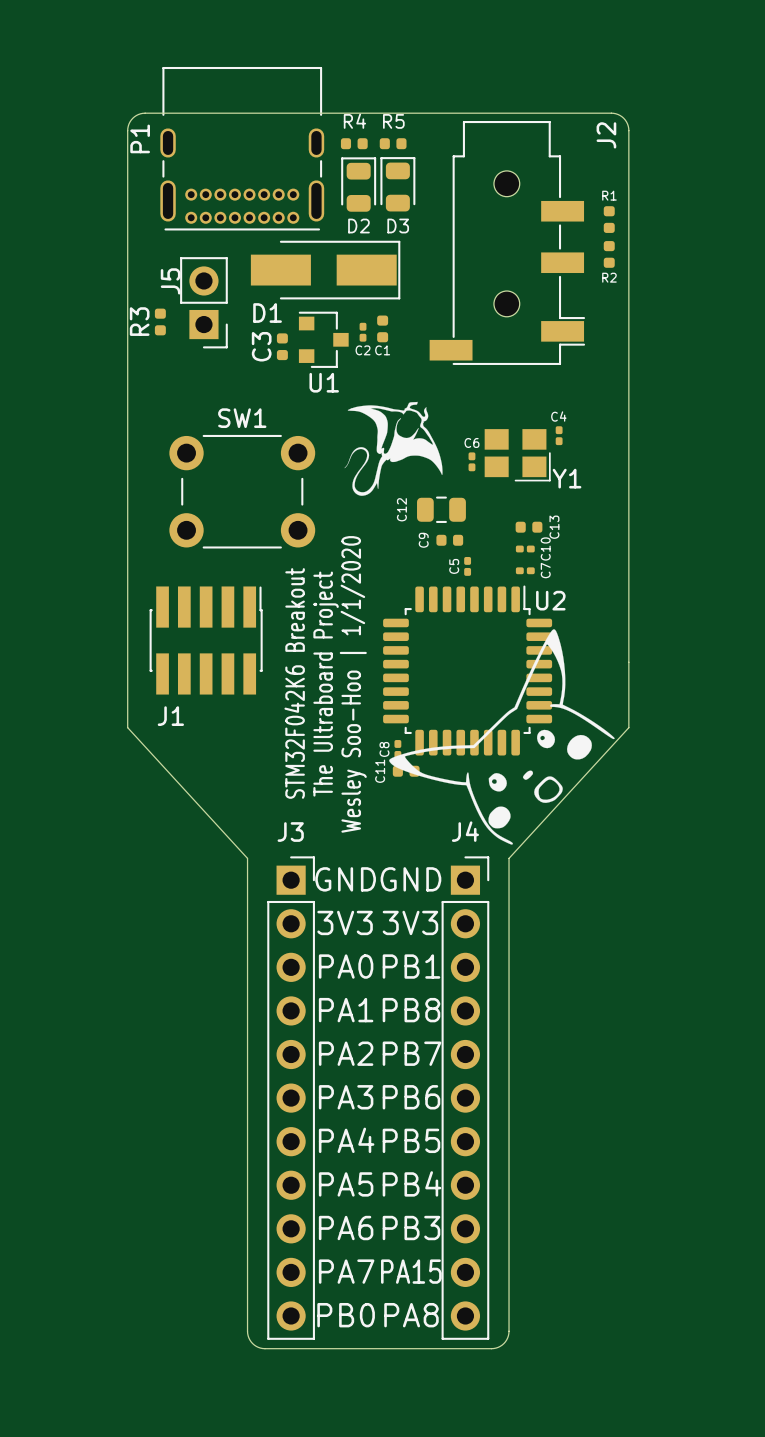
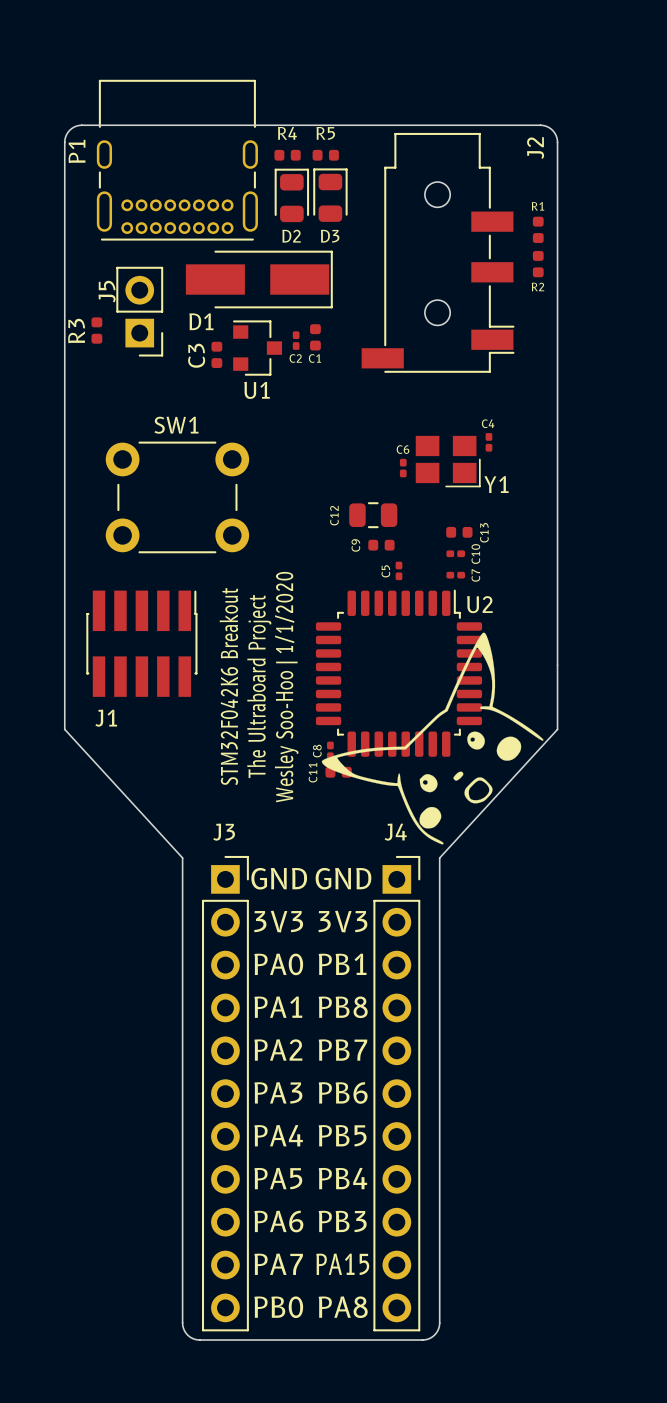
drawing: [344, 401, 443, 496] -> none

